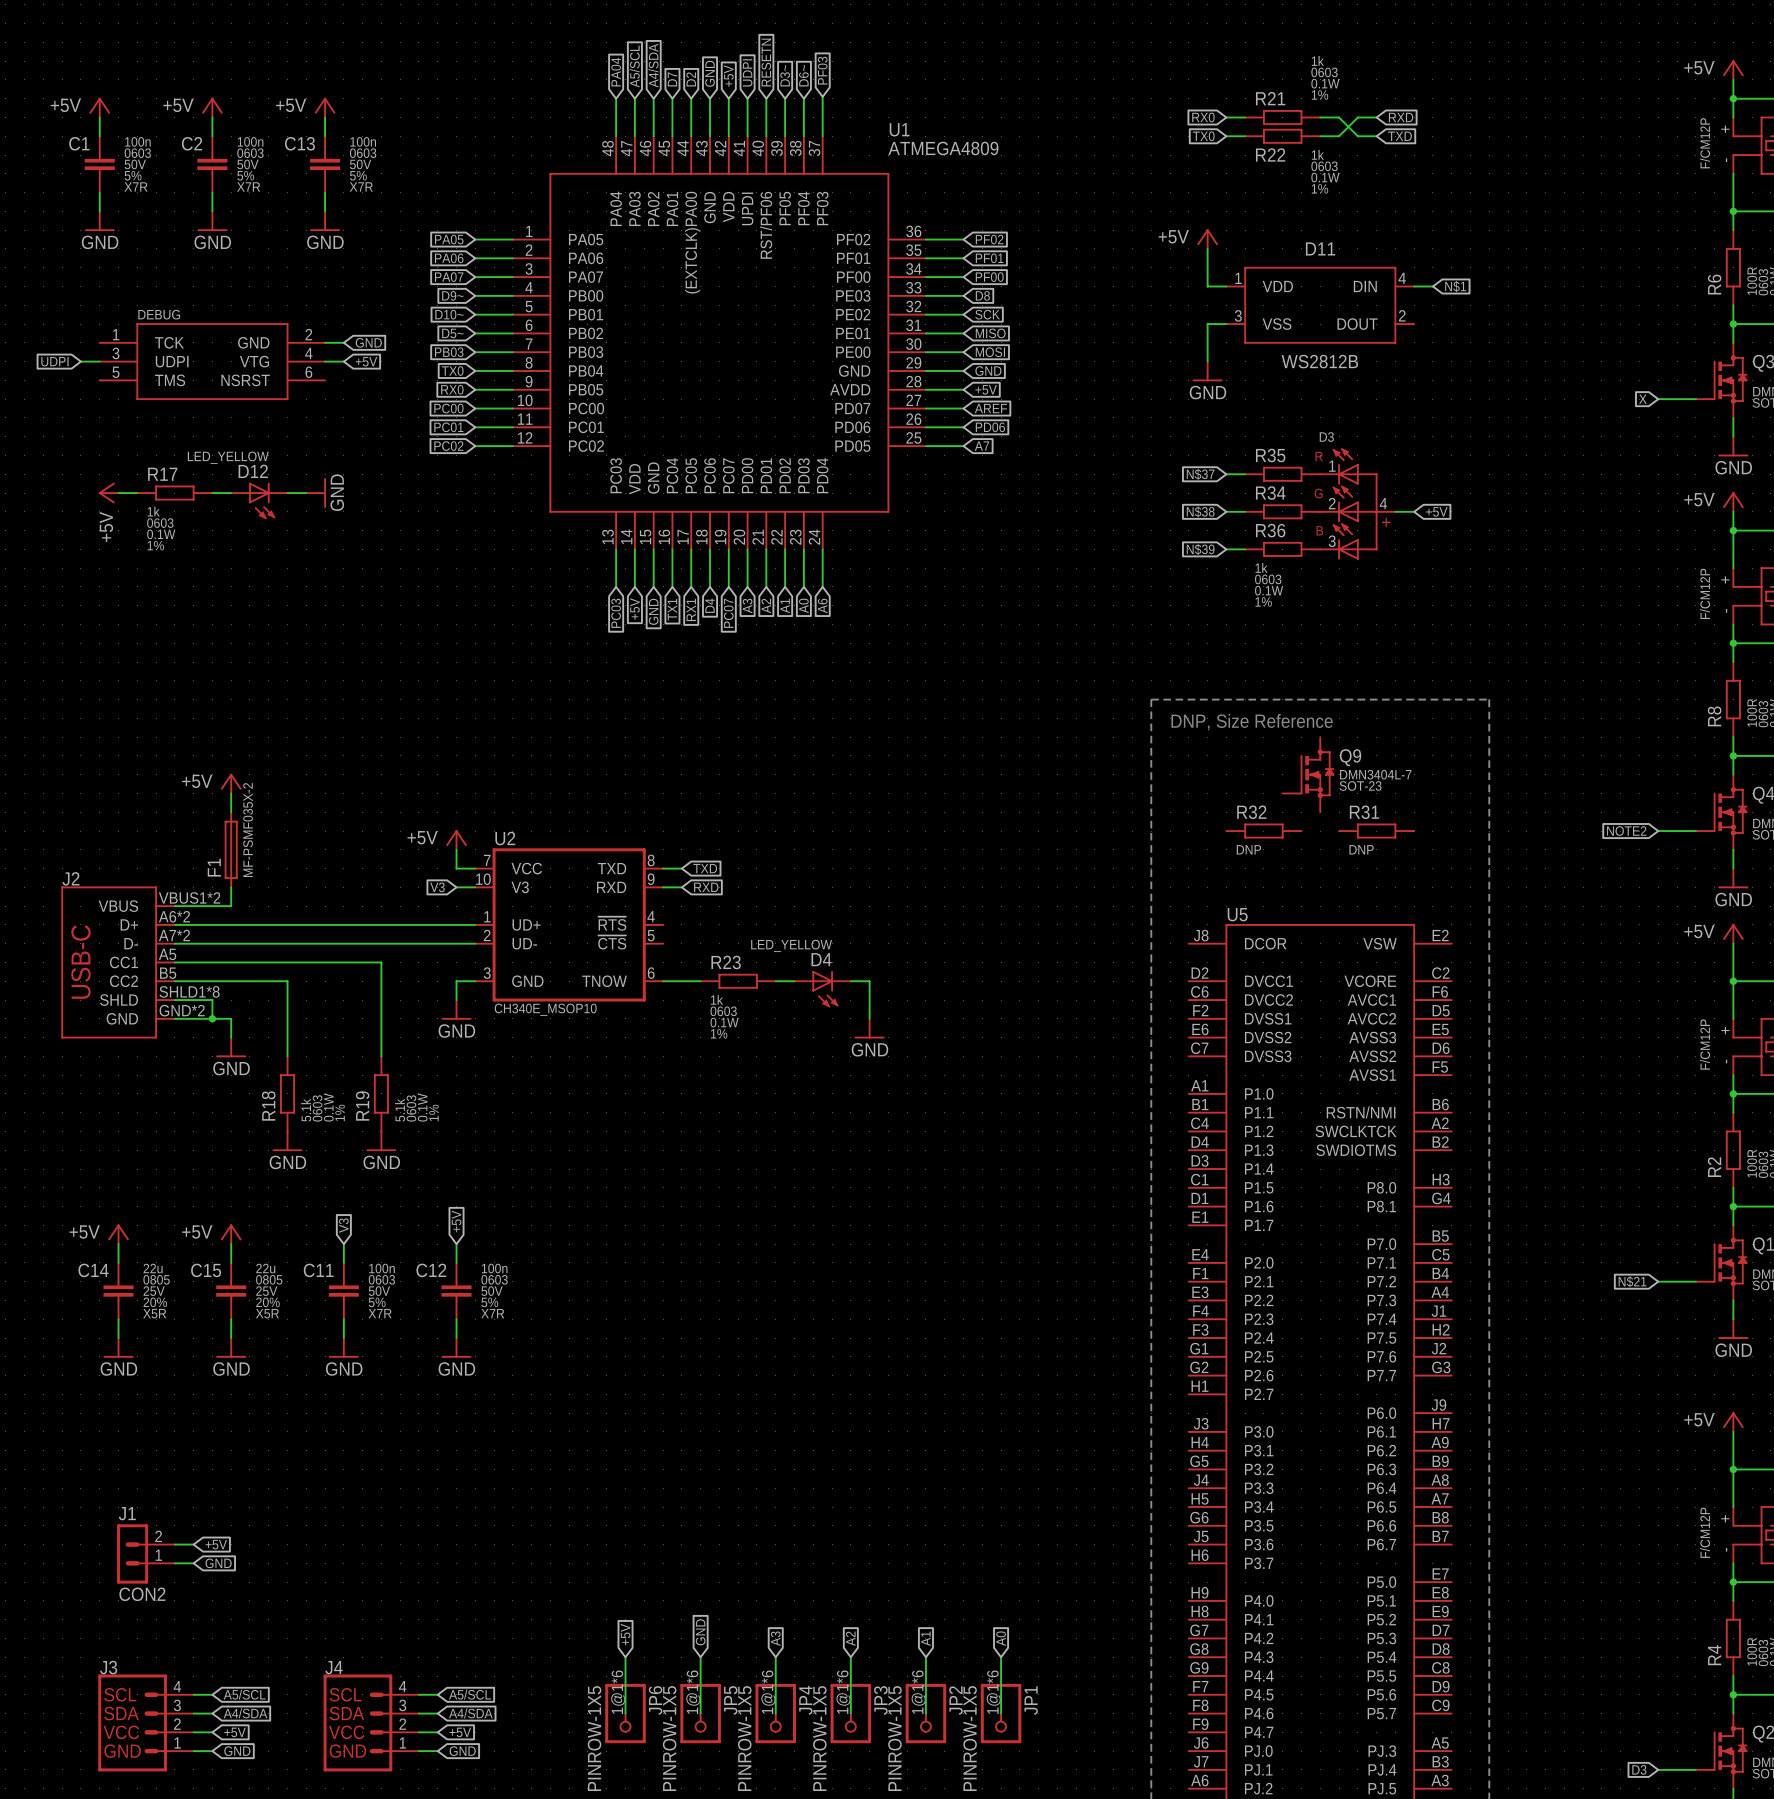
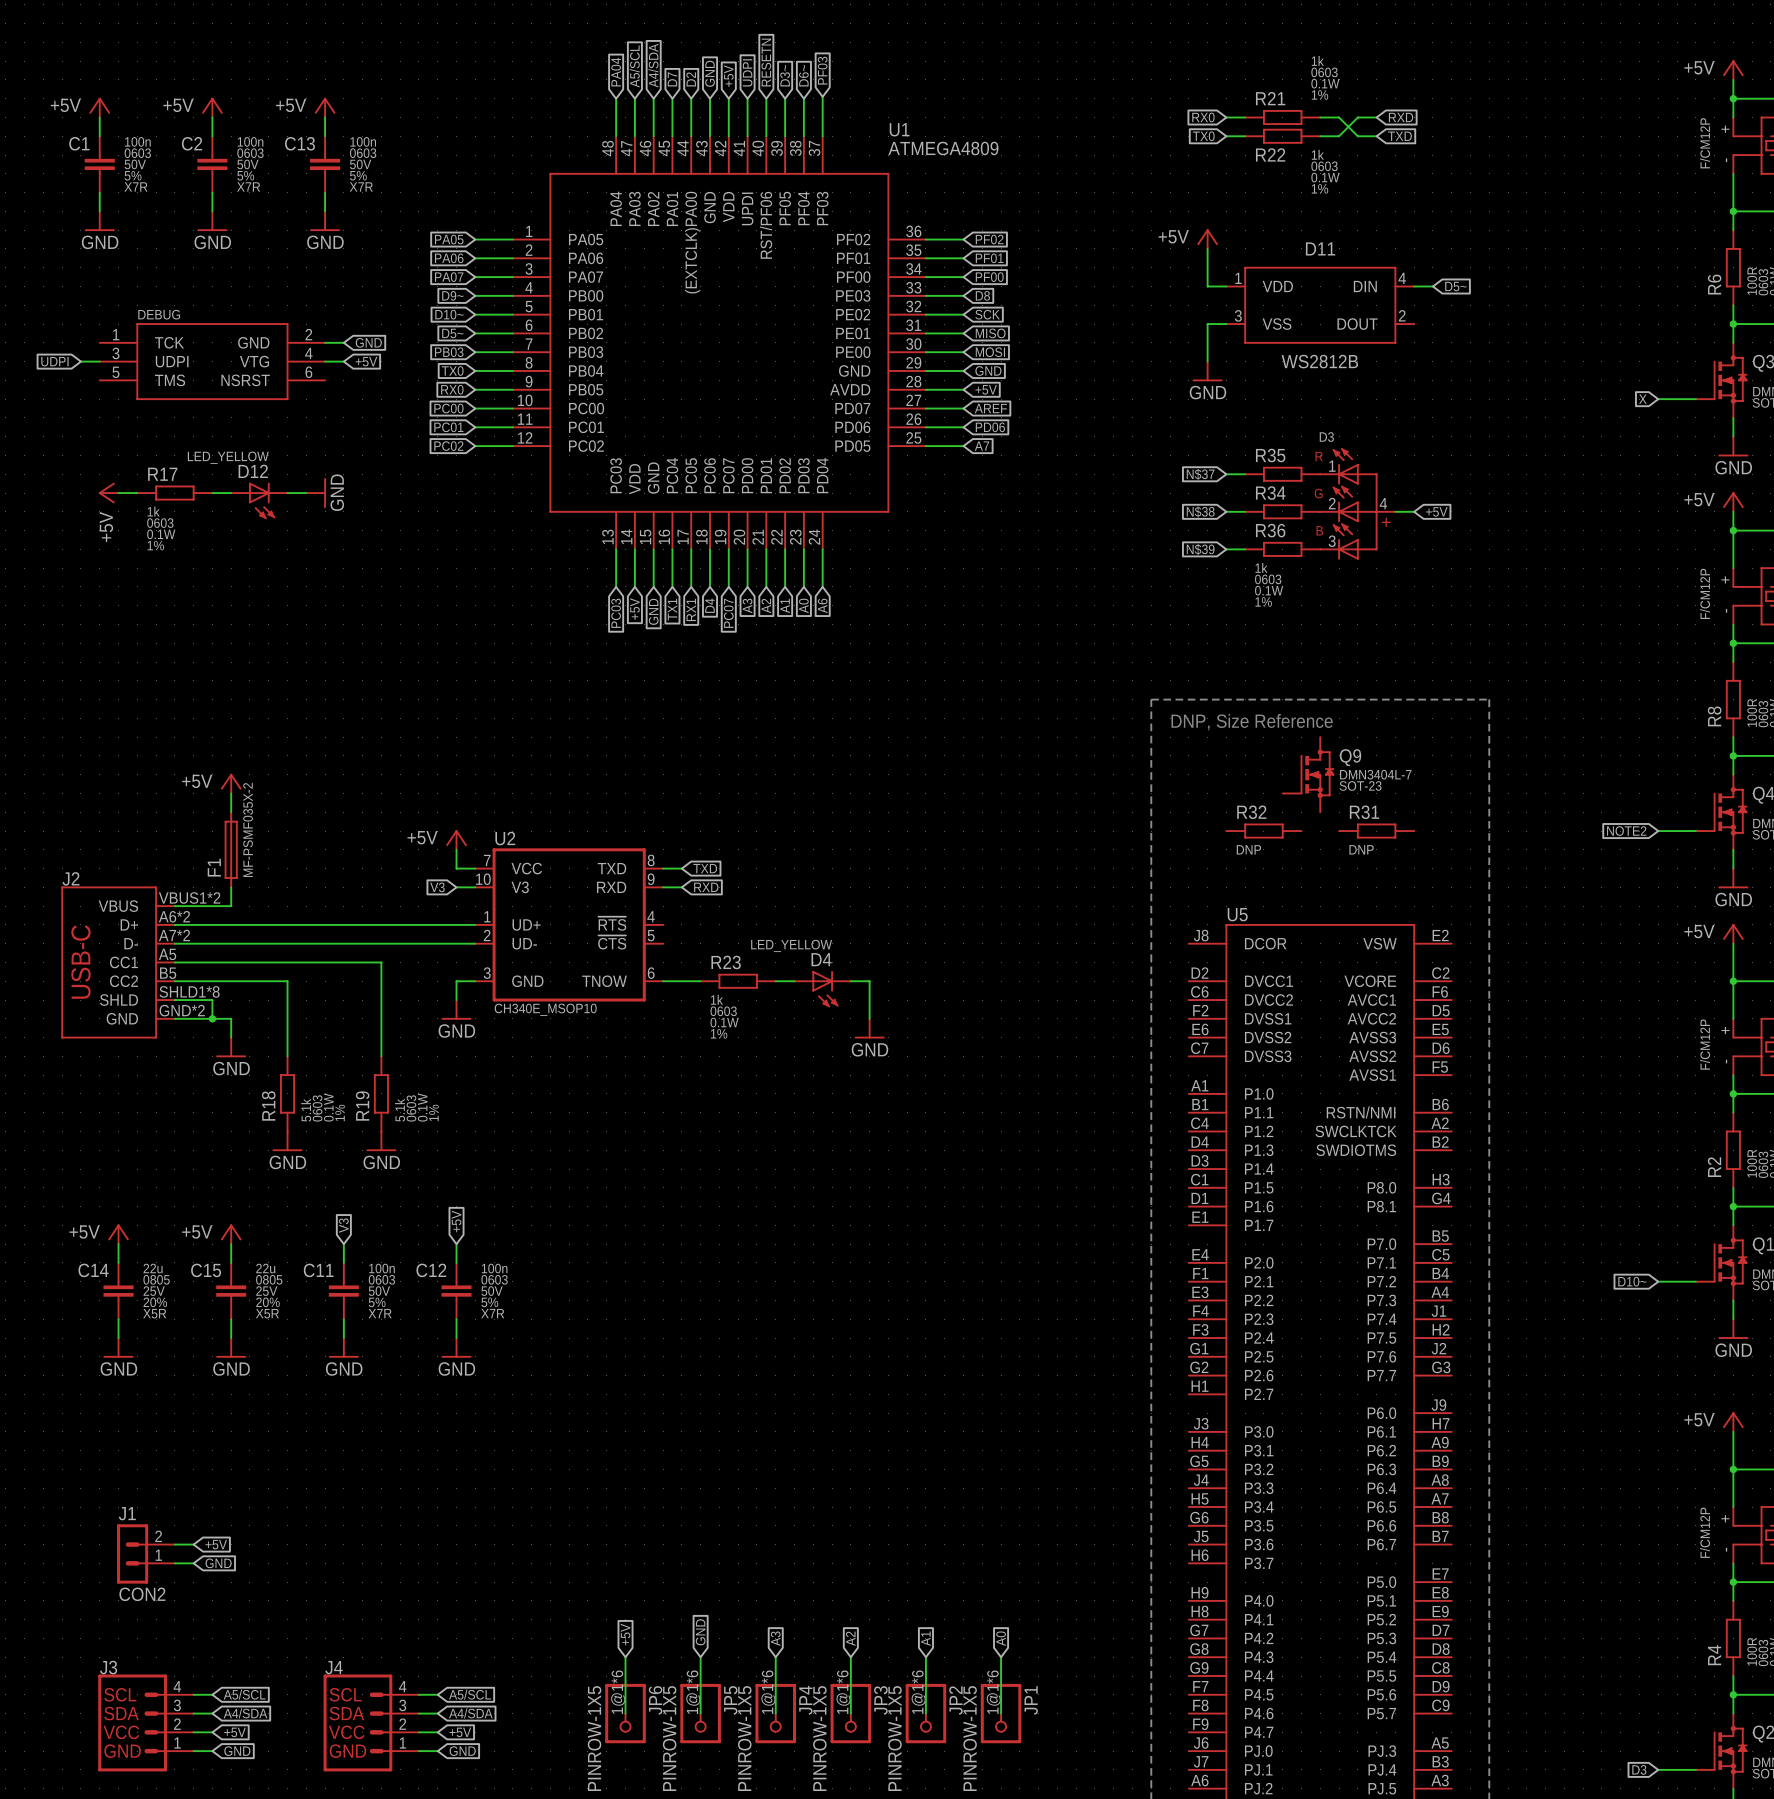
global label: N$1 (1455, 286) -> D5~ (1455, 286)
global label: N$21 (1632, 1281) -> D10~ (1632, 1281)

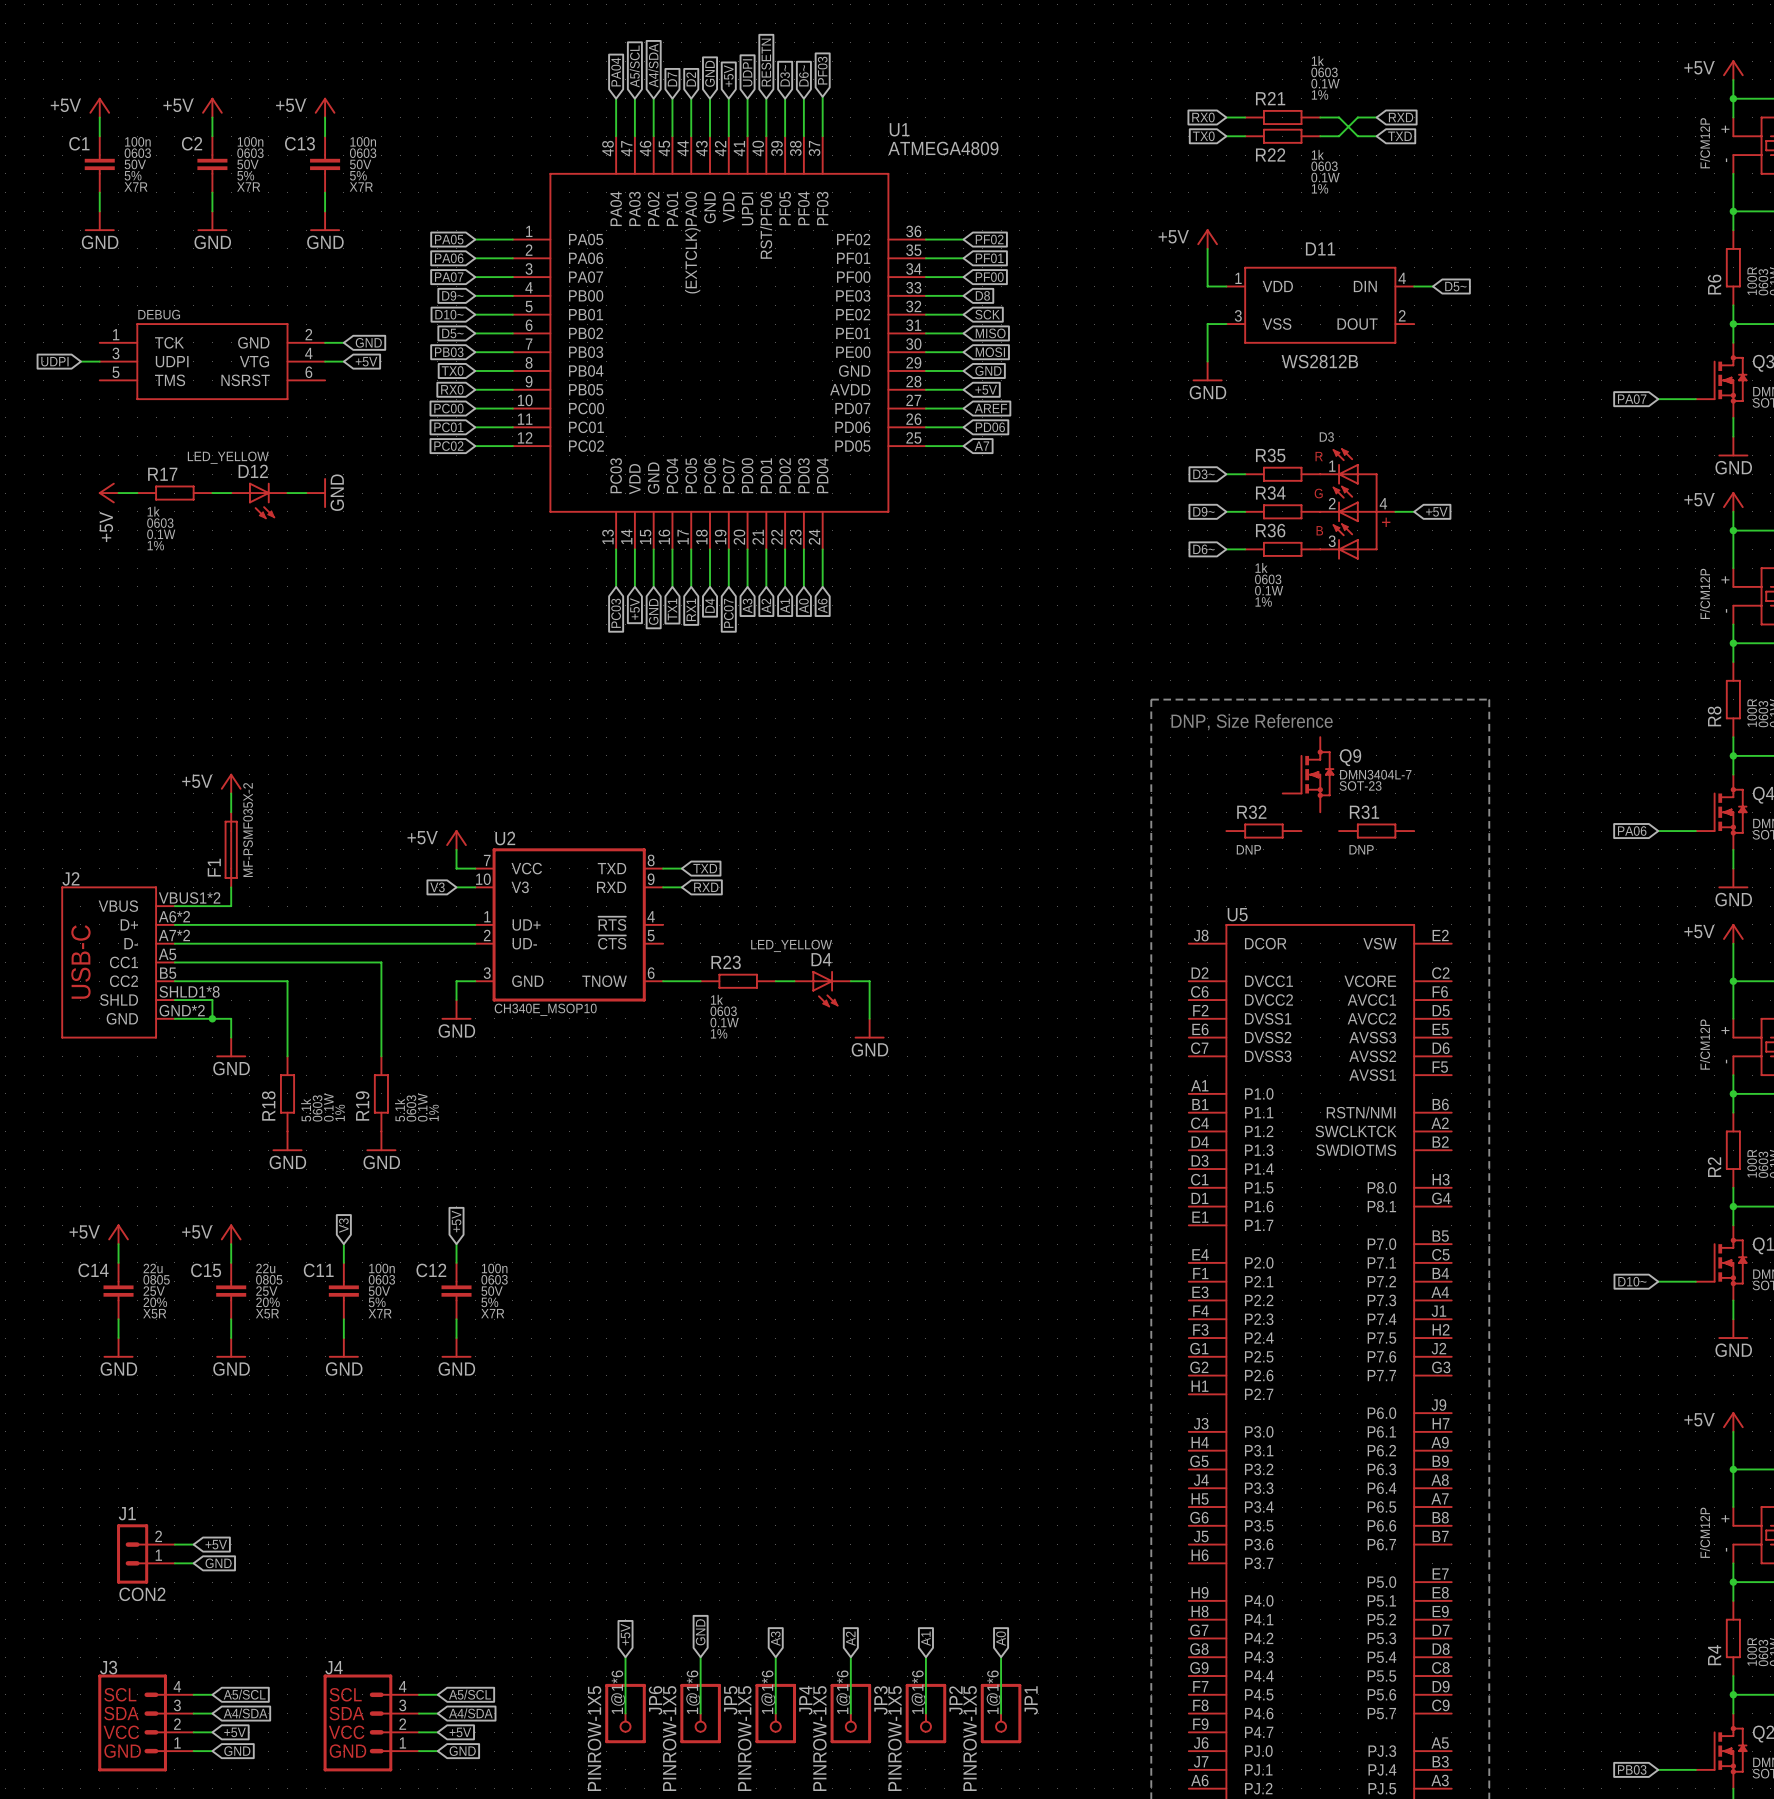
global label: X (1642, 399) -> PA07 (1632, 399)
global label: N$37 (1200, 474) -> D3~ (1203, 474)
global label: N$38 (1200, 511) -> D9~ (1203, 511)
global label: N$39 (1200, 549) -> D6~ (1203, 549)
global label: NOTE2 (1626, 831) -> PA06 (1632, 831)
global label: D3 (1639, 1769) -> PB03 (1632, 1769)

